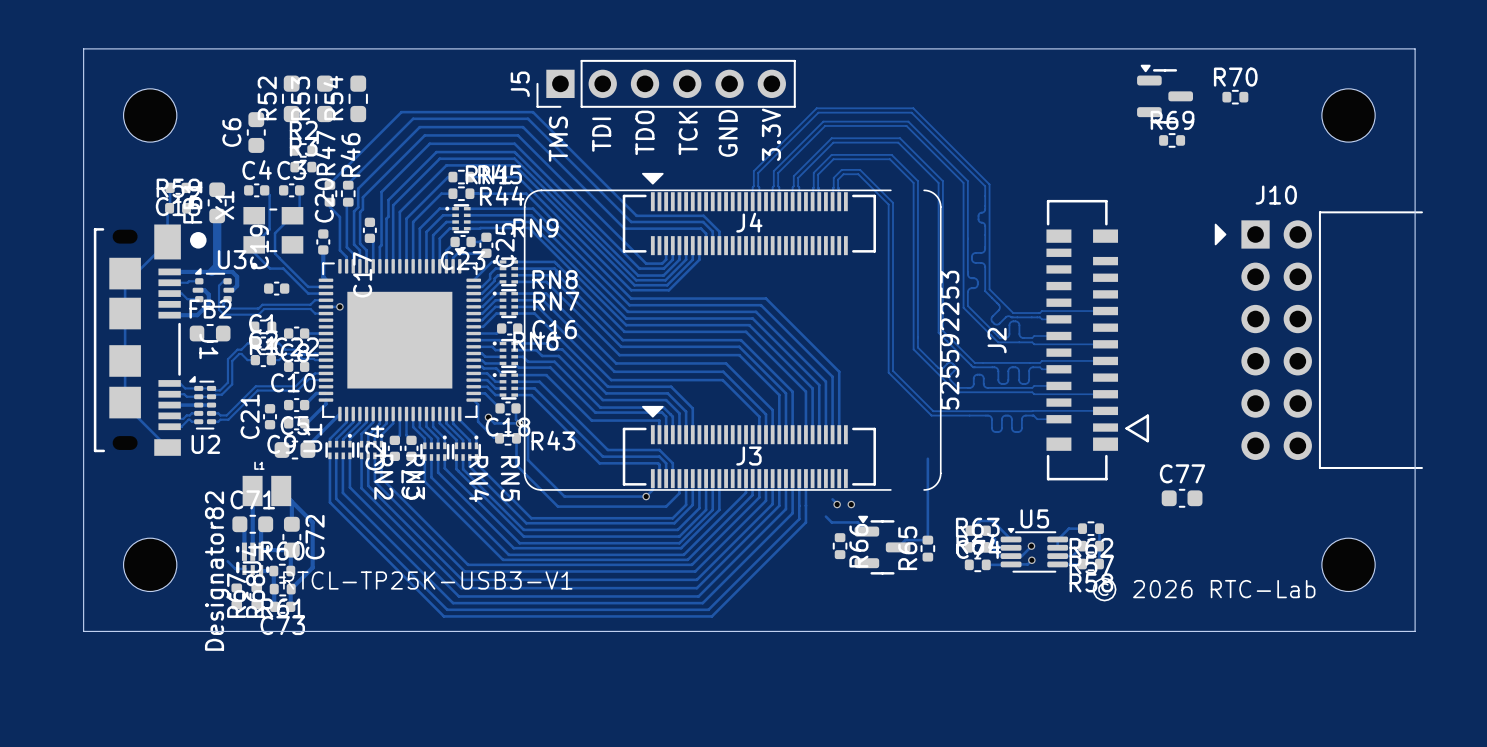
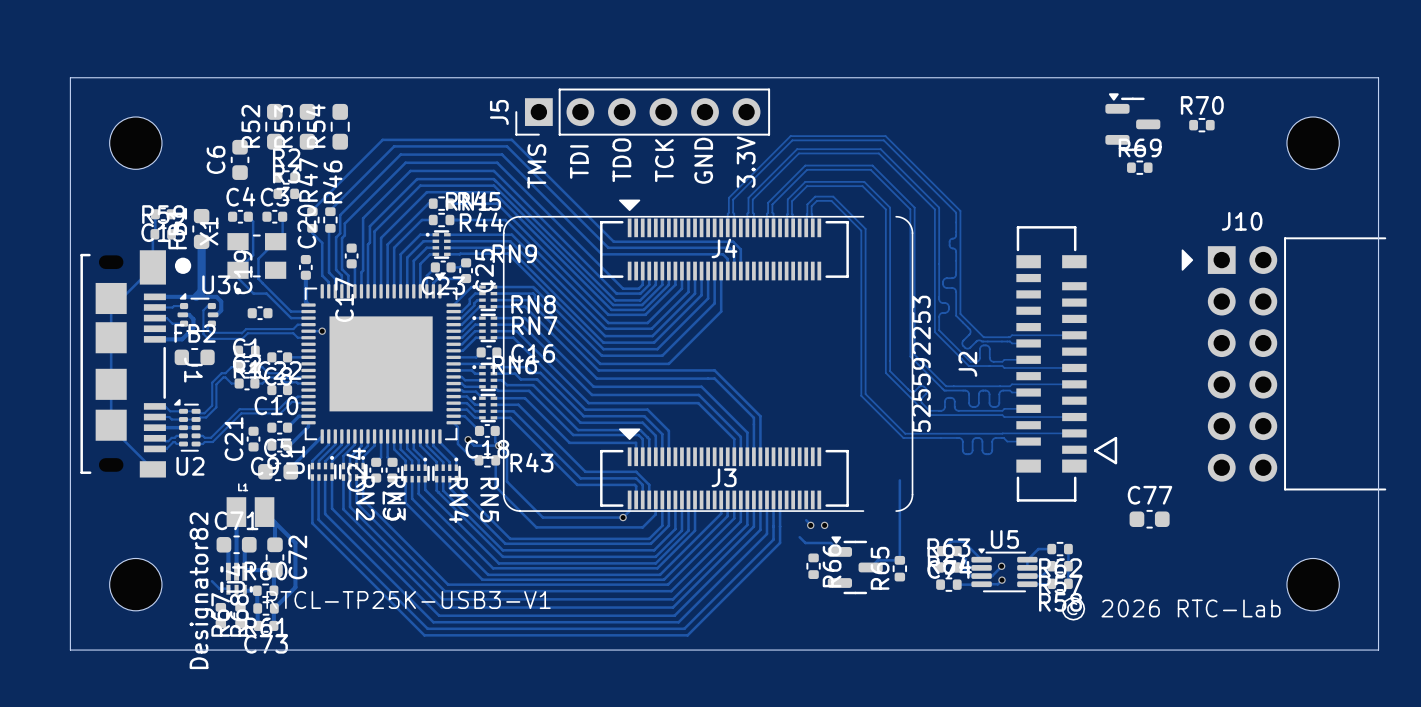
track: (703, 215) (719, 231) (719, 245) -> (679, 241) (733, 241) (740, 249) (740, 271)
track: (703, 221) (712, 231) (712, 245) -> (679, 247) (729, 247) (734, 252) (734, 271)
track: (701, 228) (706, 233) (706, 245) -> (677, 254) (722, 254) (727, 259) (727, 271)
track: (671, 298) (766, 298) (839, 371) (839, 434) -> (647, 323) (681, 288) (681, 271)
track: (628, 304) (761, 305) (832, 376) (832, 434) -> (605, 328) (651, 328) (688, 291) (688, 271)
track: (676, 311) (756, 311) (825, 381) (825, 434) -> (652, 336) (695, 293) (695, 271)
track: (677, 318) (752, 318) (819, 385) (819, 434) -> (654, 342) (701, 295) (701, 271)
track: (681, 325) (749, 325) (812, 388) (812, 434) -> (657, 349) (708, 298) (708, 271)
track: (686, 331) (746, 331) (805, 391) (805, 434) -> (662, 355) (714, 303) (714, 271)
track: (692, 340) (741, 340) (792, 391) (792, 434) -> (668, 363) (721, 311) (721, 271)

